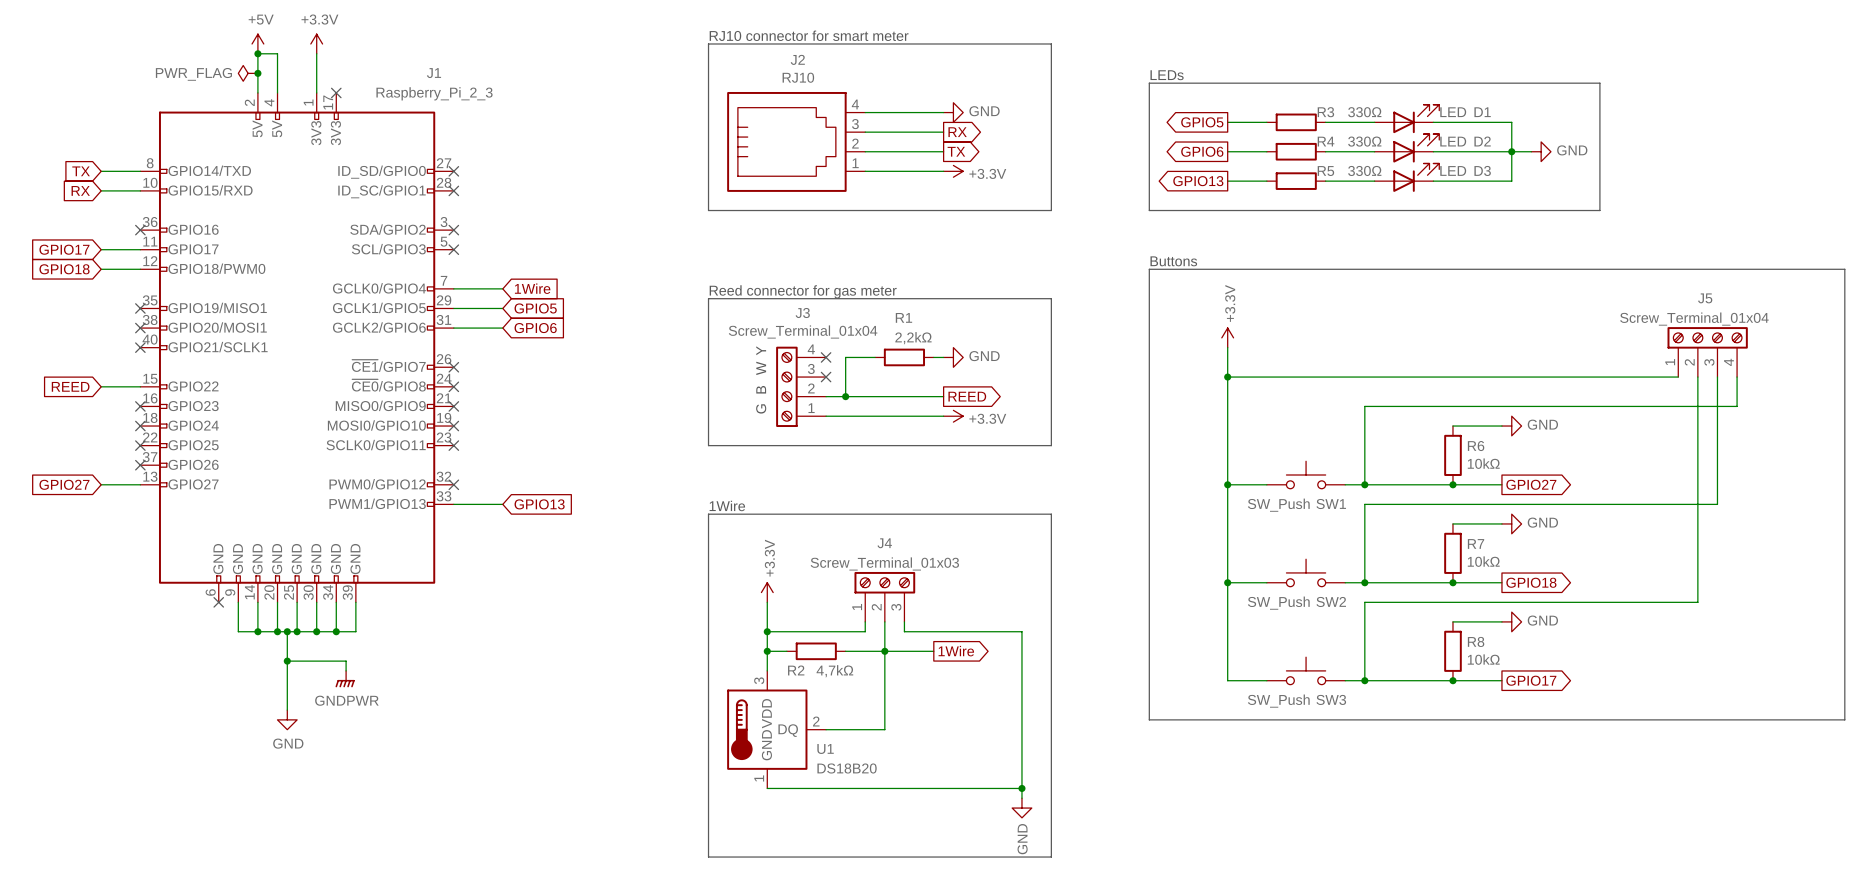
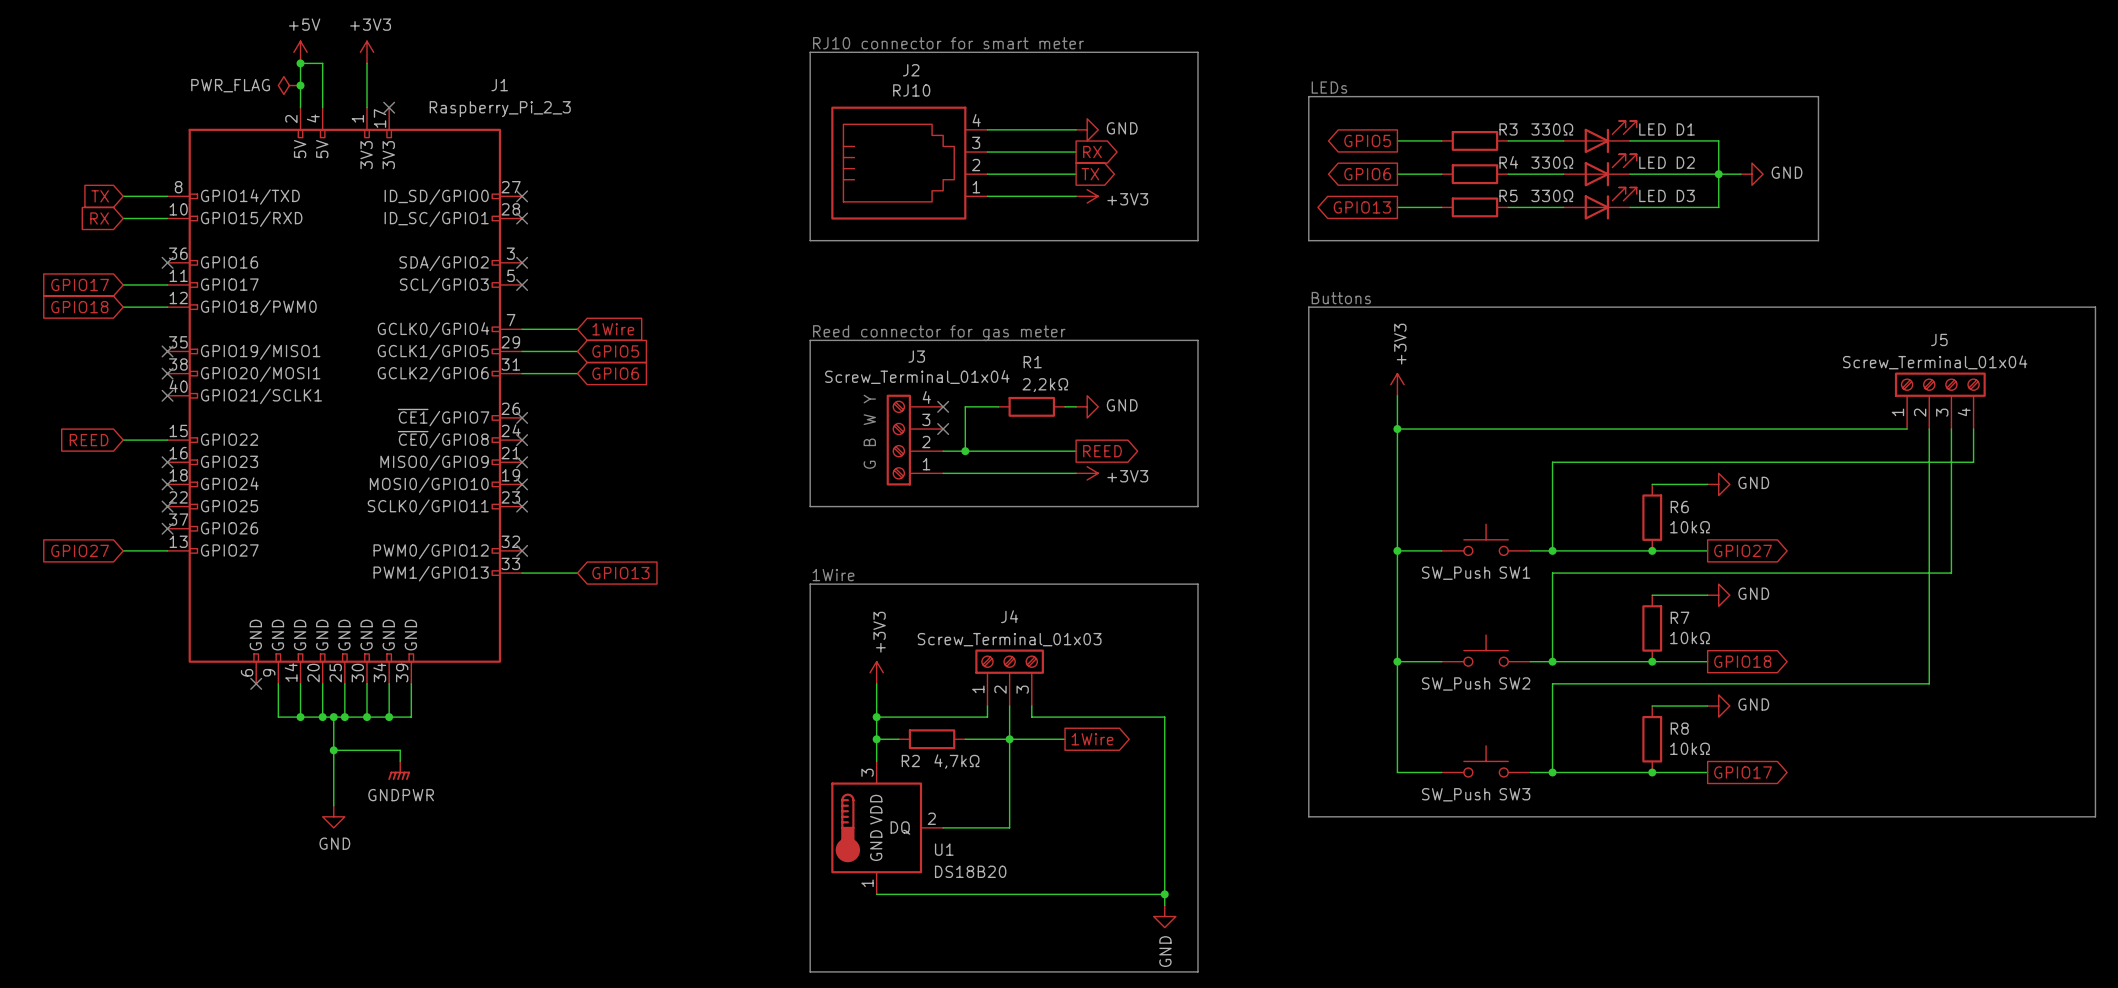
power symbol: +3.3V (316, 43) -> +3V3 (367, 52)
power symbol: +3.3V (953, 171) -> +3V3 (1087, 196)
power symbol: +3.3V (1227, 337) -> +3V3 (1397, 384)
power symbol: +3.3V (953, 416) -> +3V3 (1087, 473)
power symbol: +3.3V (767, 592) -> +3V3 (876, 672)

